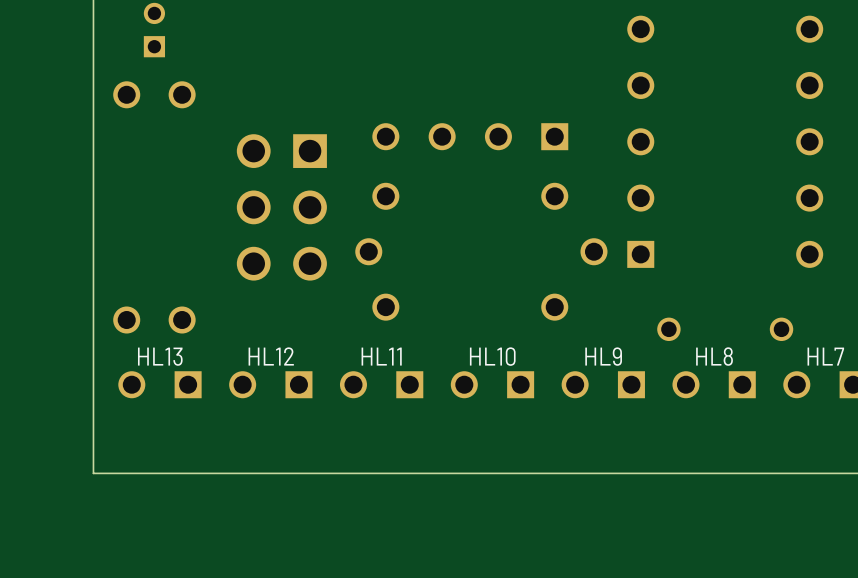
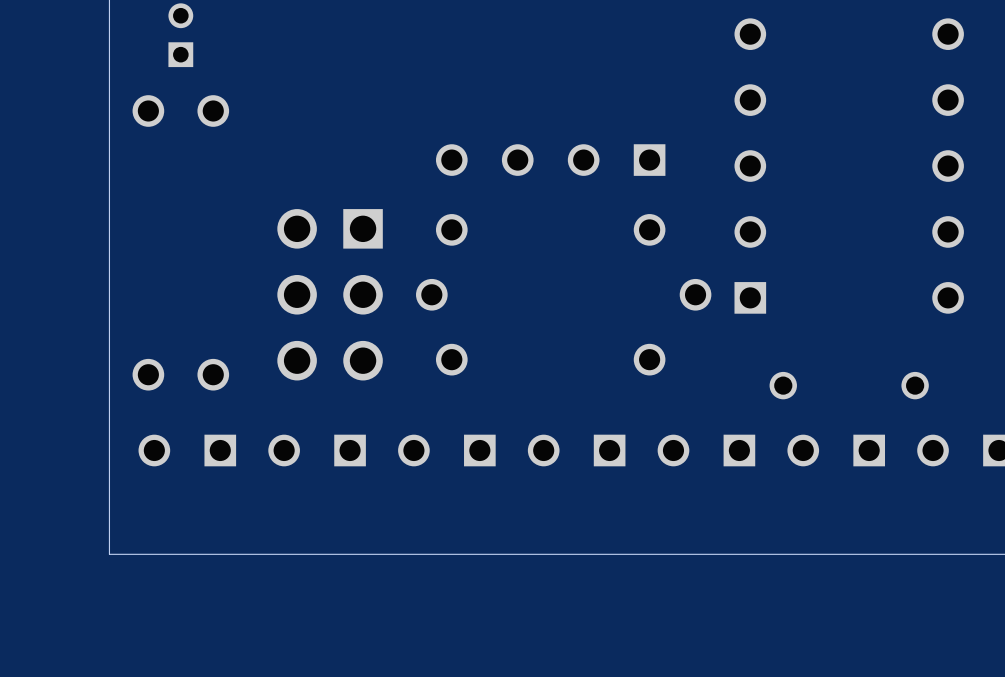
part position: (281, 207) -> (330, 294)
HL13 name: HL13 (160, 356) -> none
HL12 name: HL12 (271, 356) -> none
HL11 name: HL11 (381, 356) -> none
HL10 name: HL10 (492, 356) -> none
HL9 name: HL9 (603, 356) -> none
HL8 name: HL8 (714, 356) -> none
HL7 name: HL7 (825, 356) -> none

